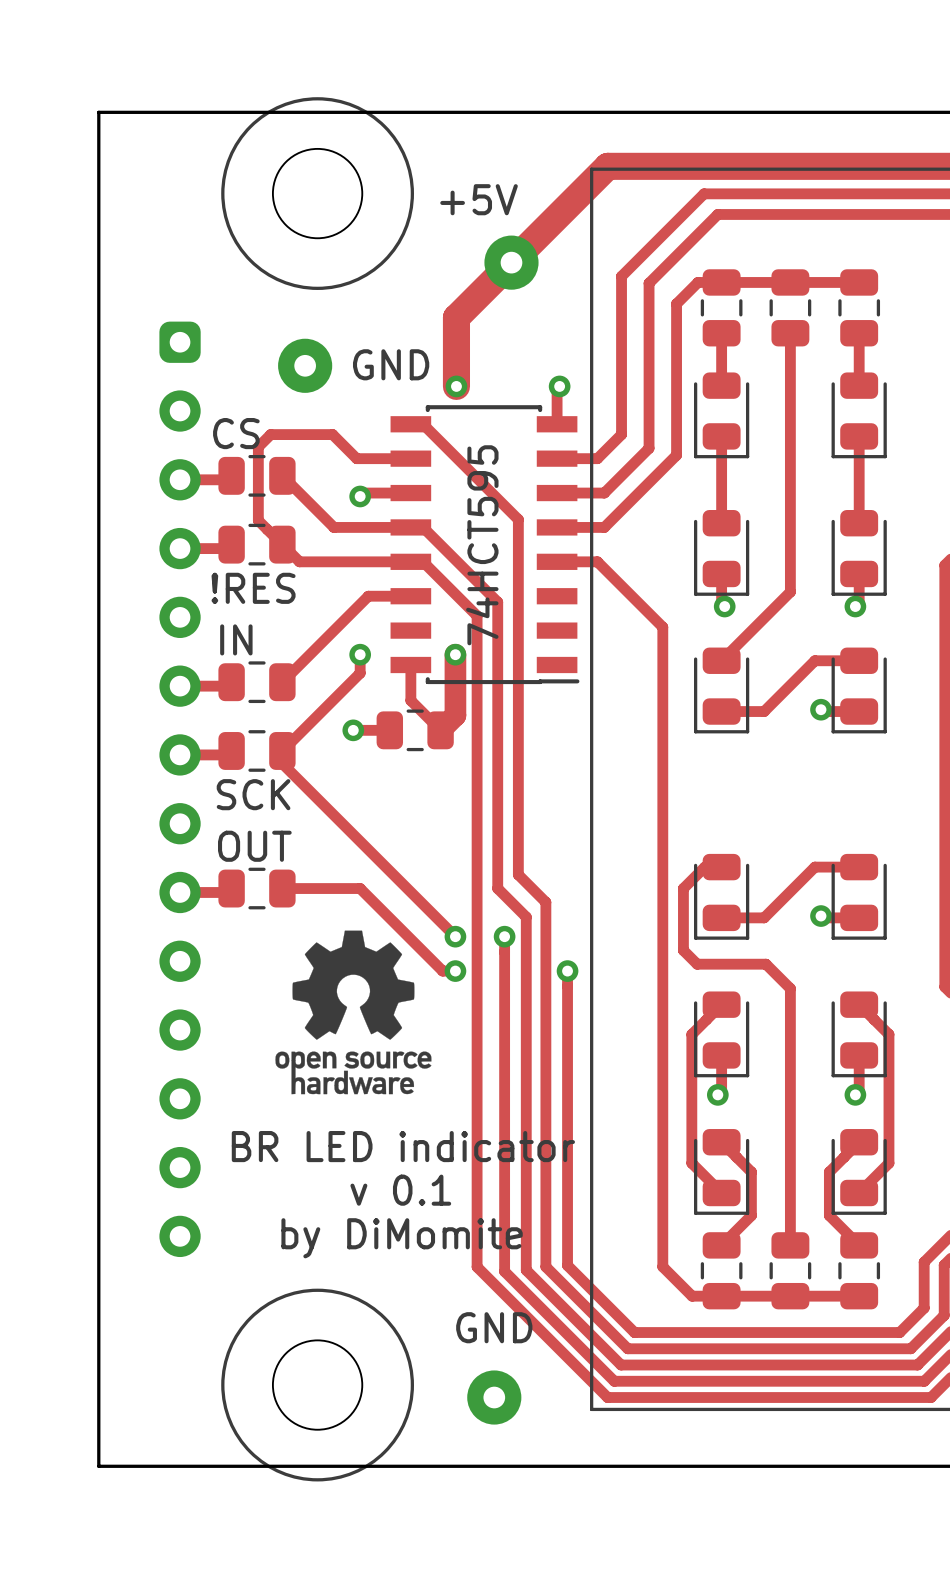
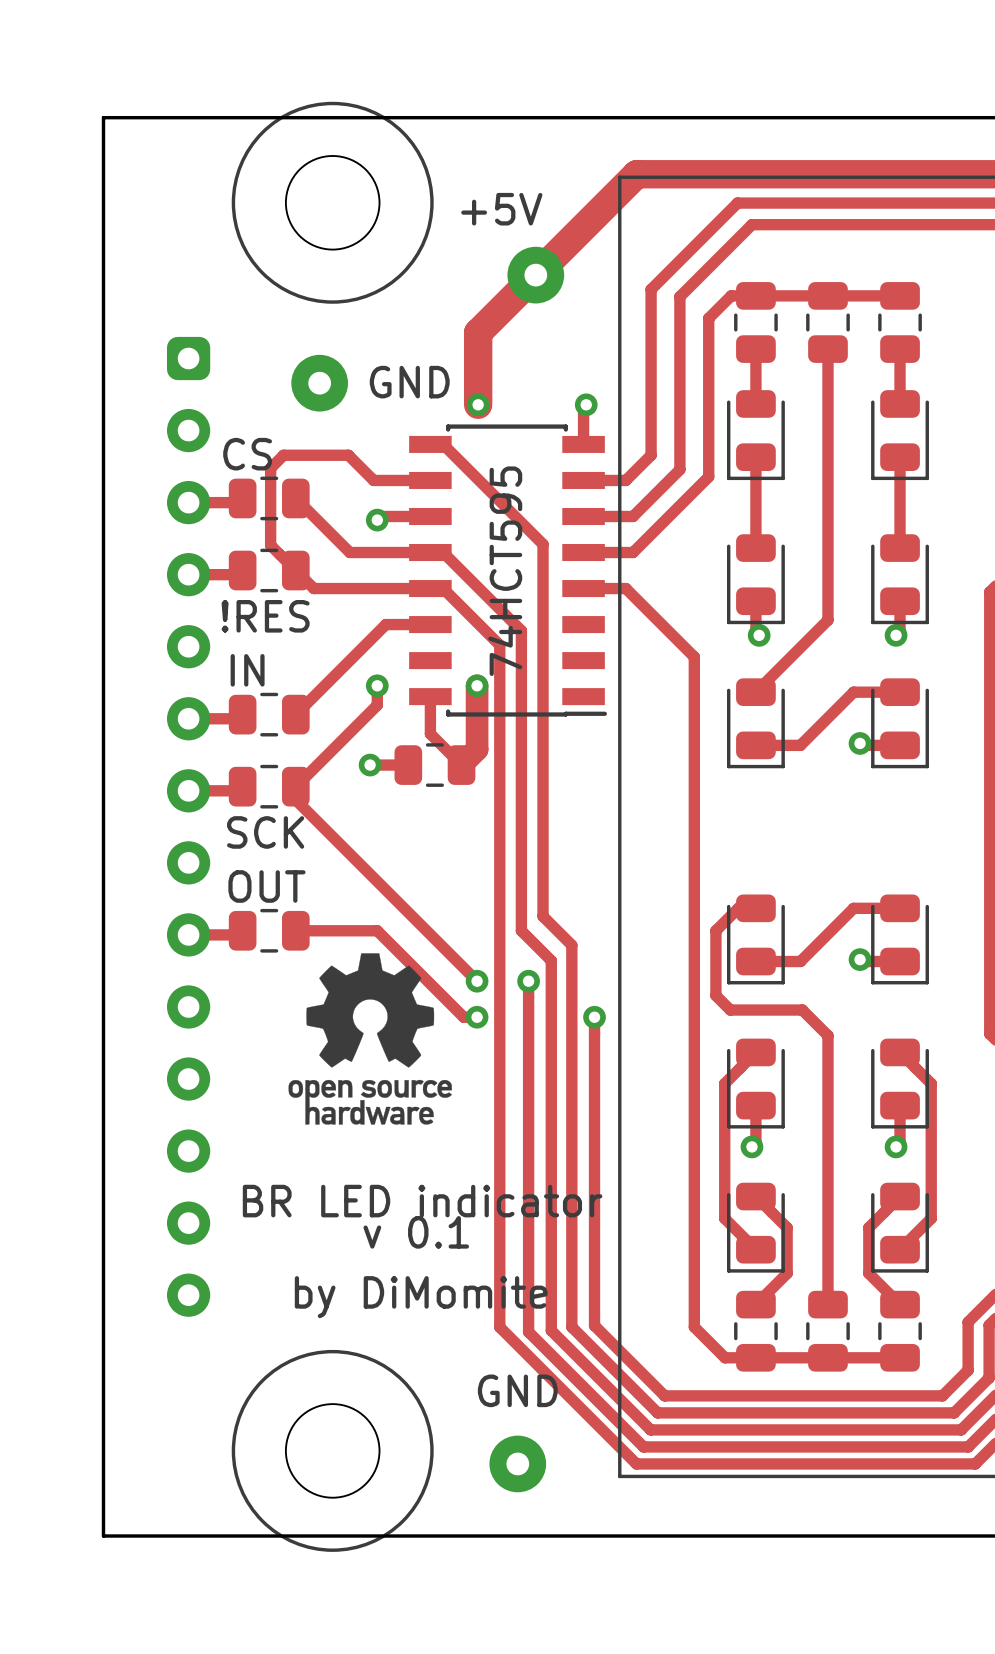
drawing position: (353, 1012) -> (370, 1038)
text position: v 0.1 (400, 1190) -> v 0.1 (416, 1232)

